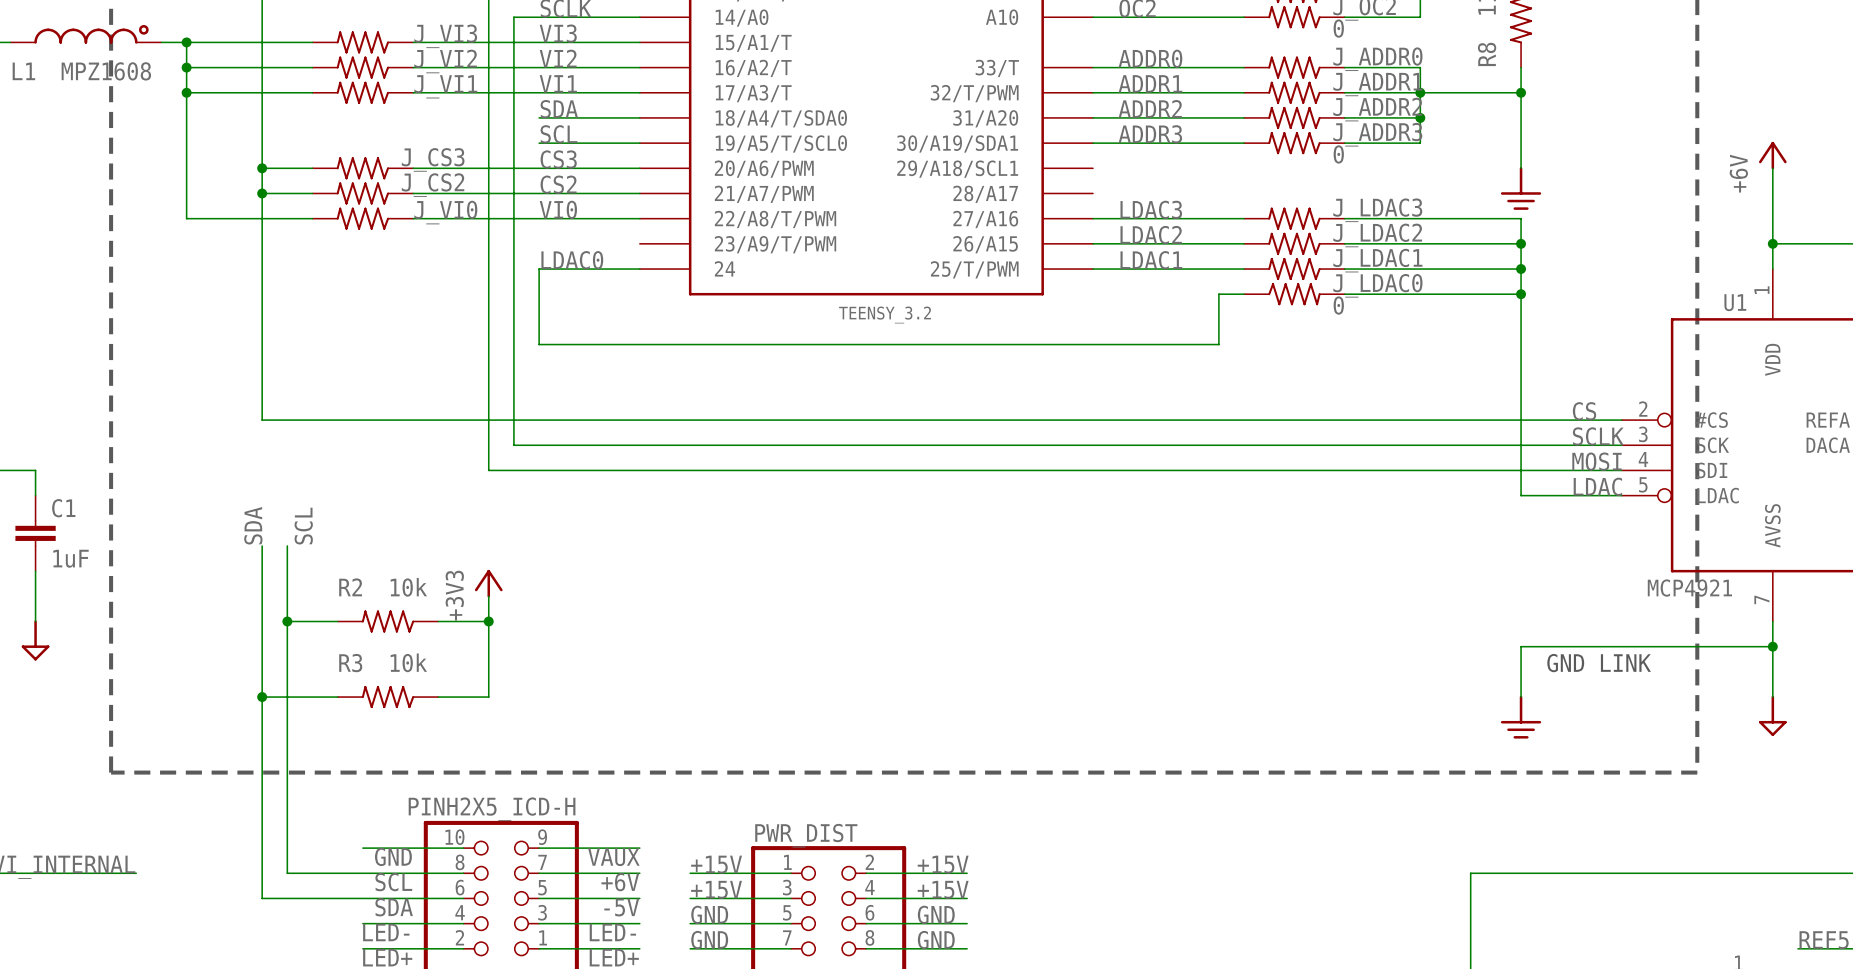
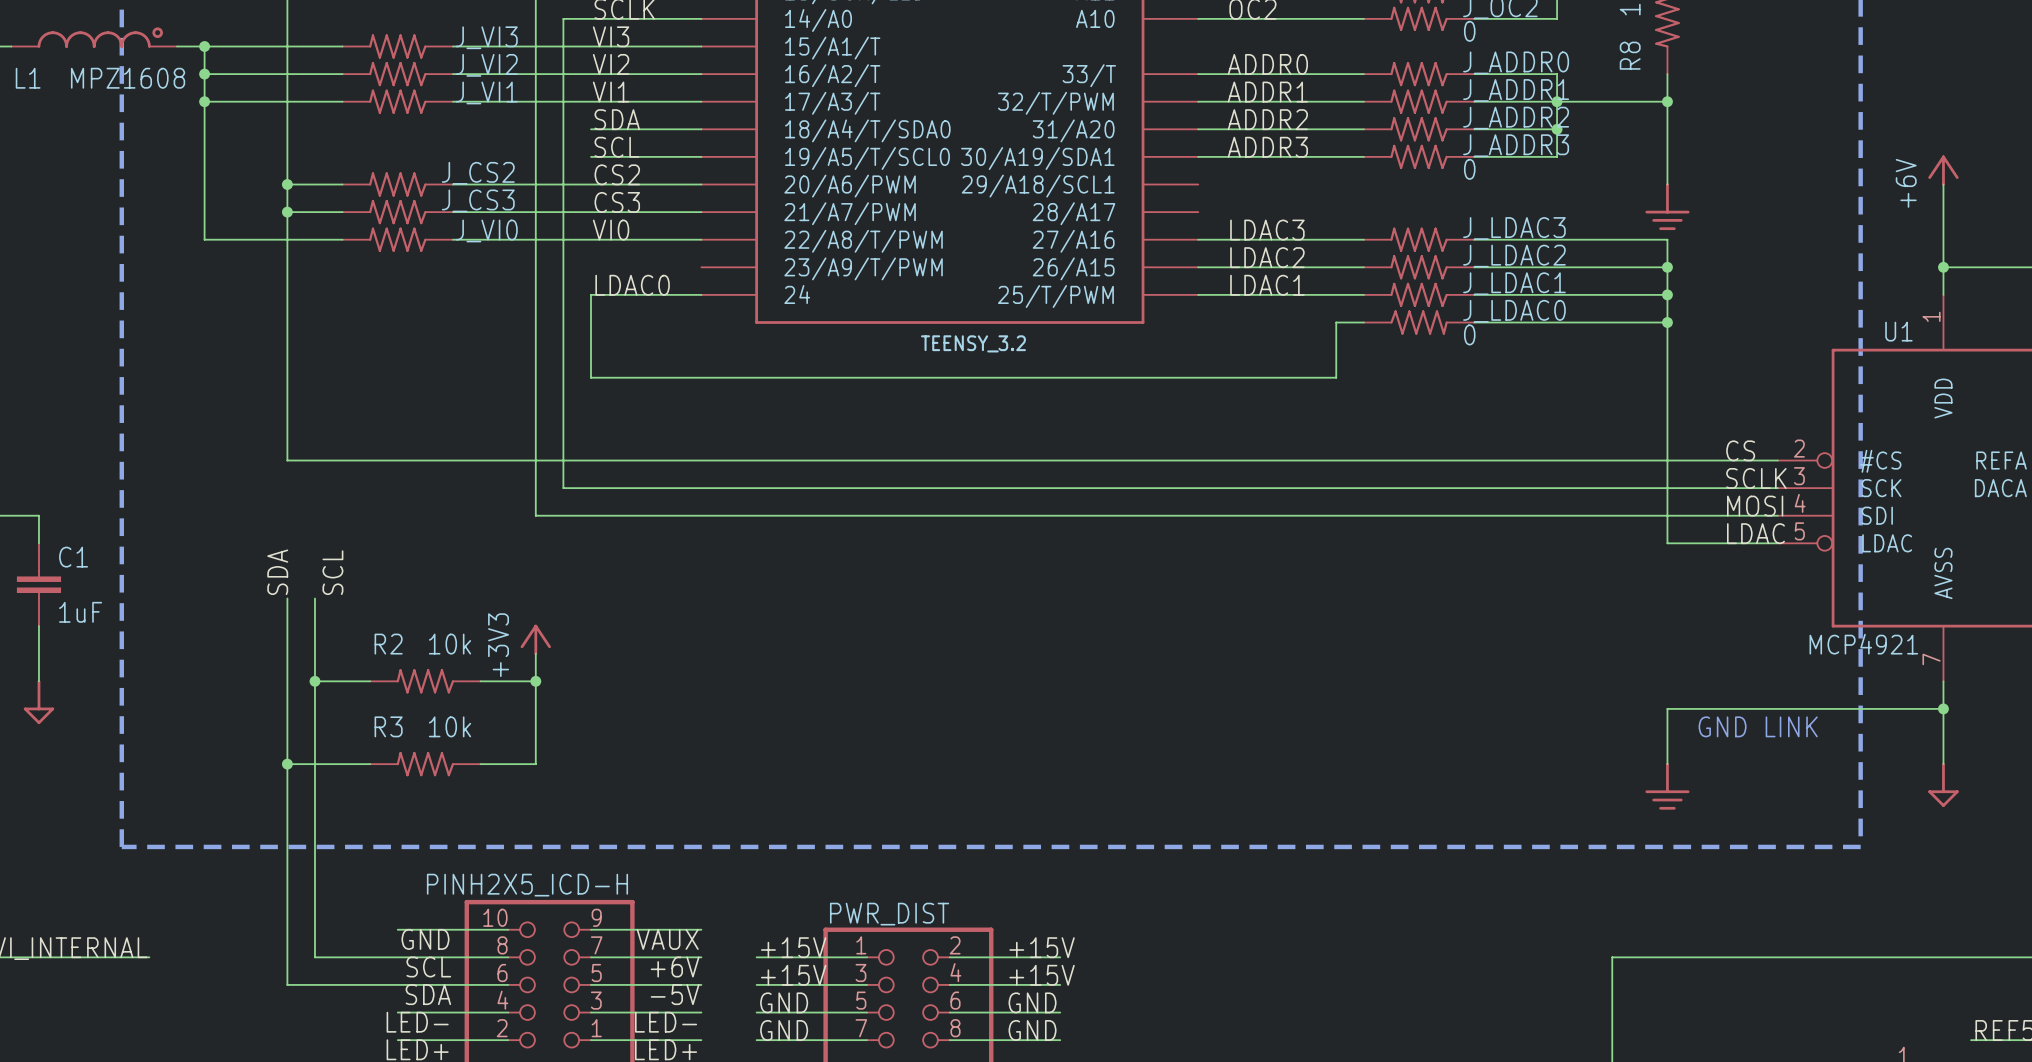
J_CS3 name: J_CS3 (433, 159) -> J_CS2 (478, 173)
label: CS3 (558, 159) -> CS2 (617, 174)
label: CS2 (558, 184) -> CS3 (617, 202)
J_CS2 name: J_CS2 (433, 185) -> J_CS3 (478, 200)

